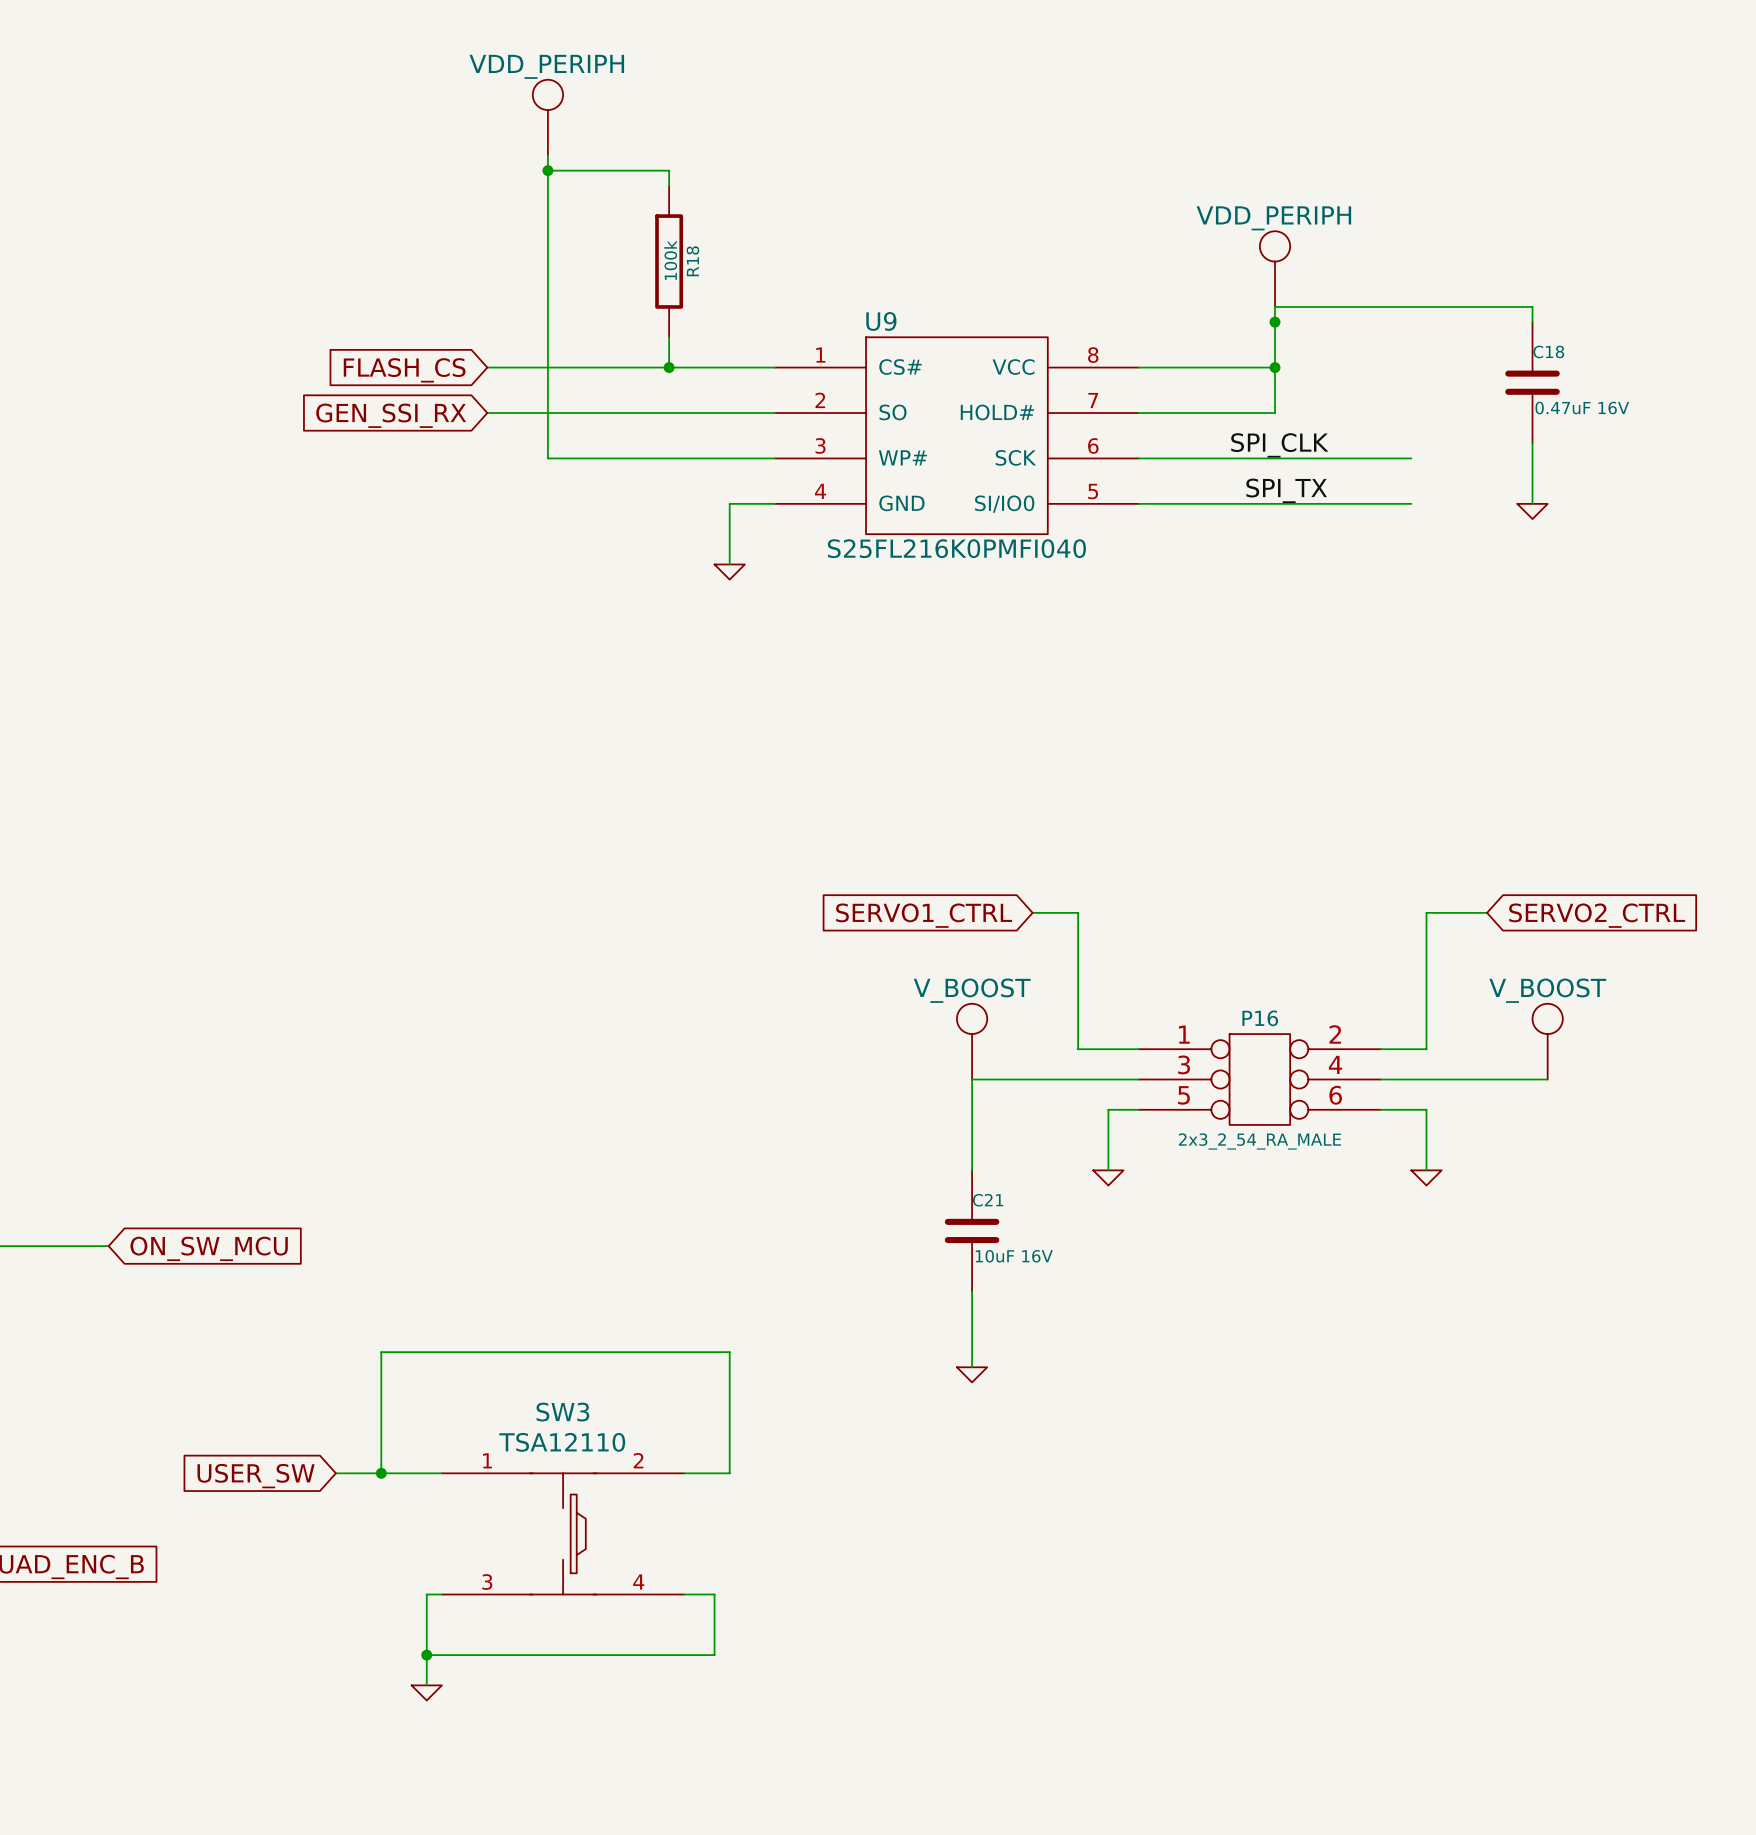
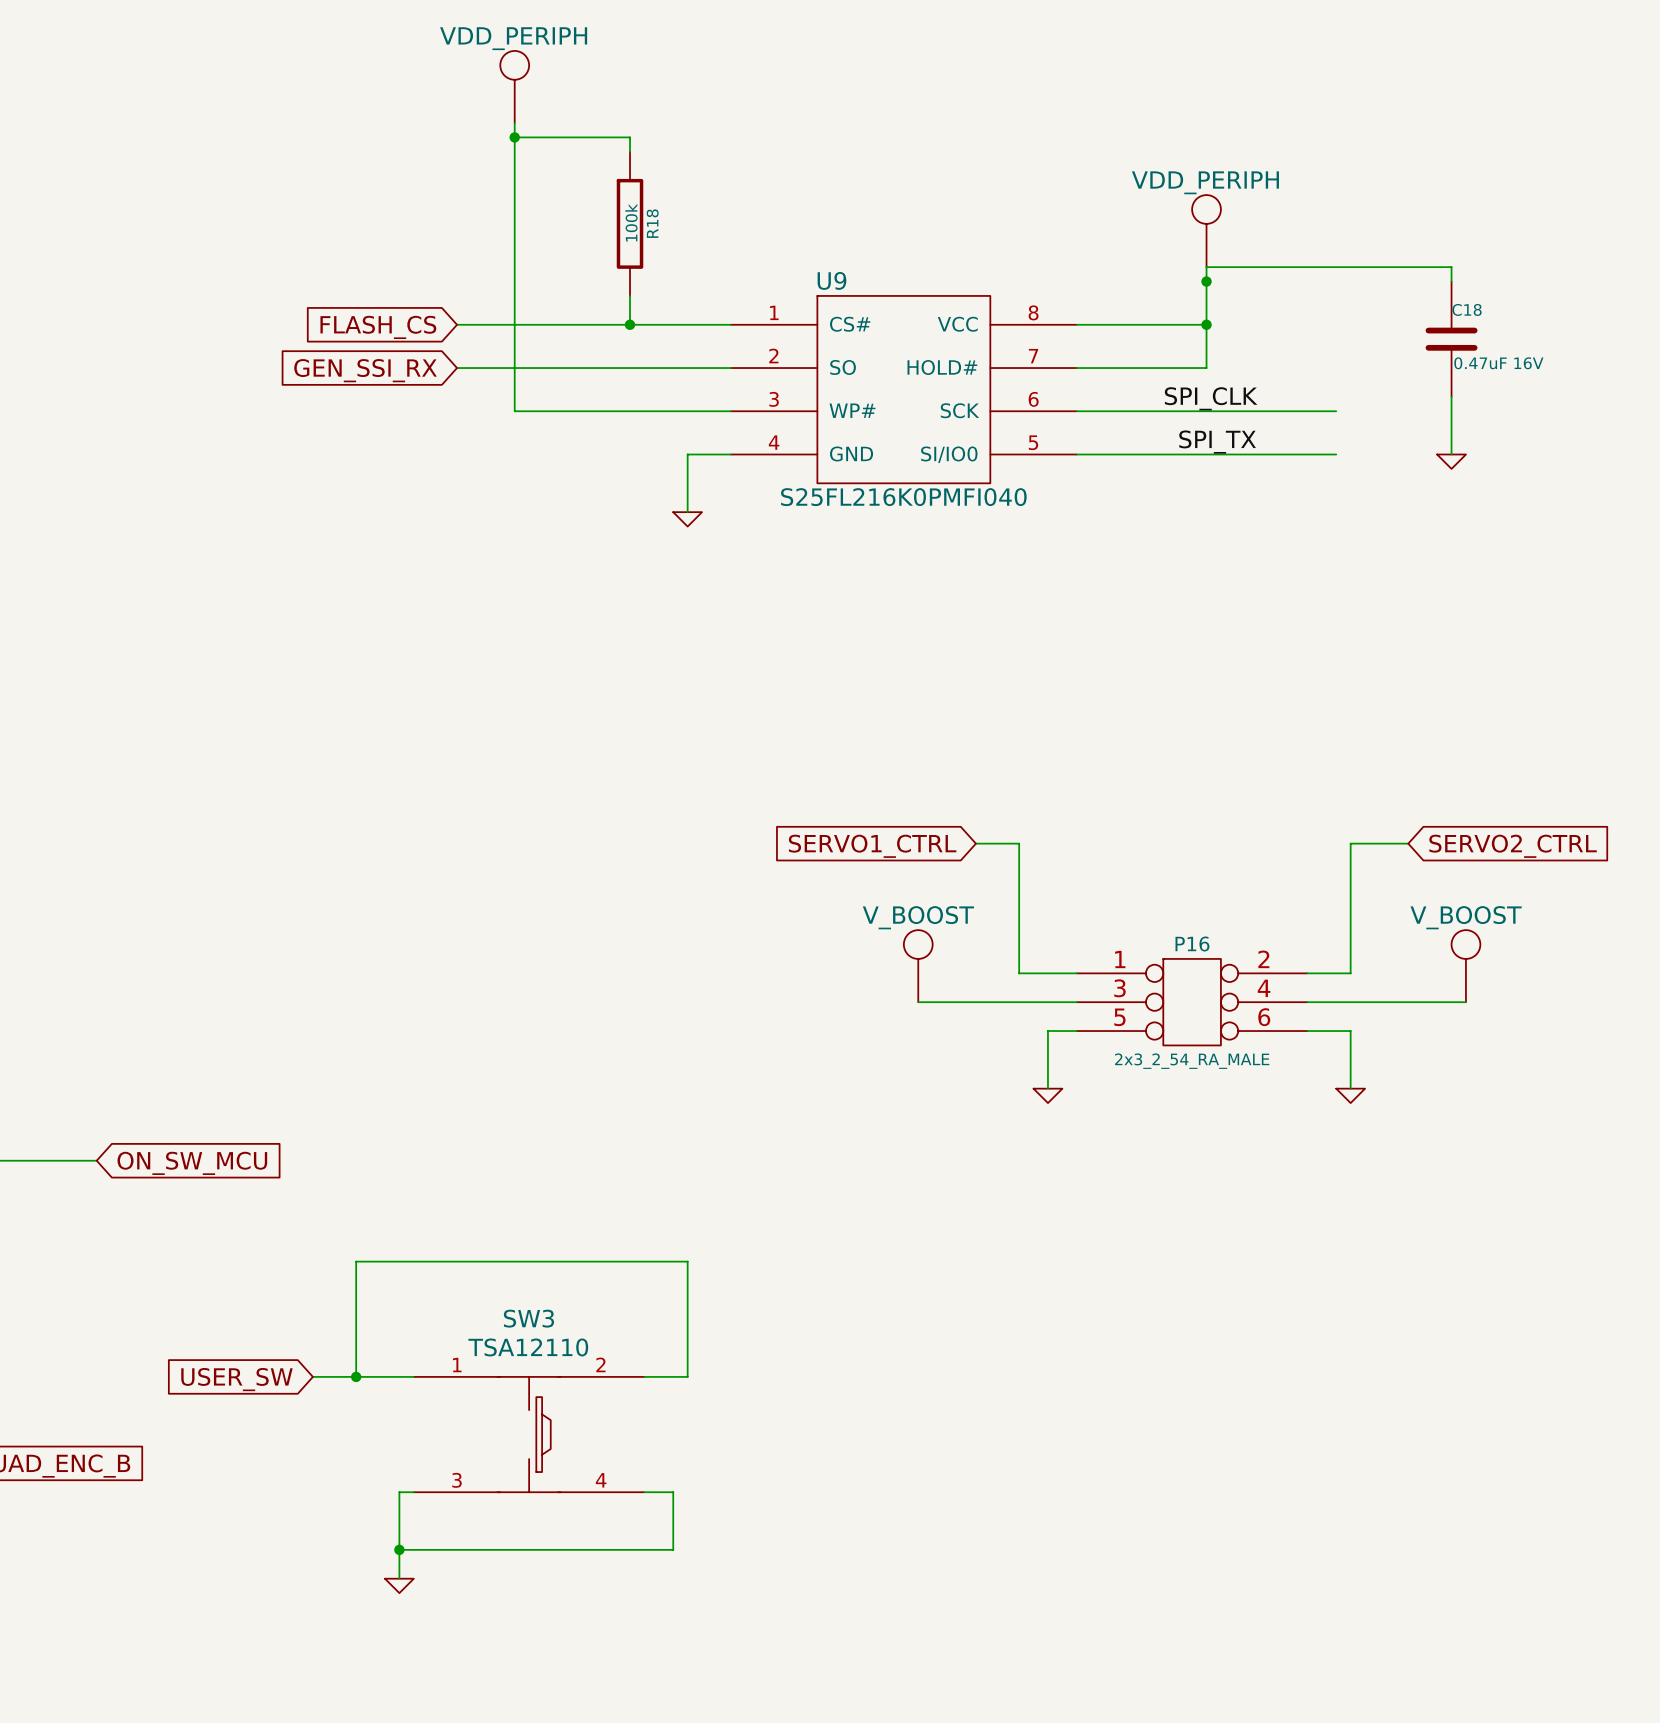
wire: (972, 1079) (972, 1170) -> none
C21: 10uF 16V (972, 1230) -> none
wire: (972, 1291) (972, 1367) -> none
power symbol: (972, 1374) -> none

